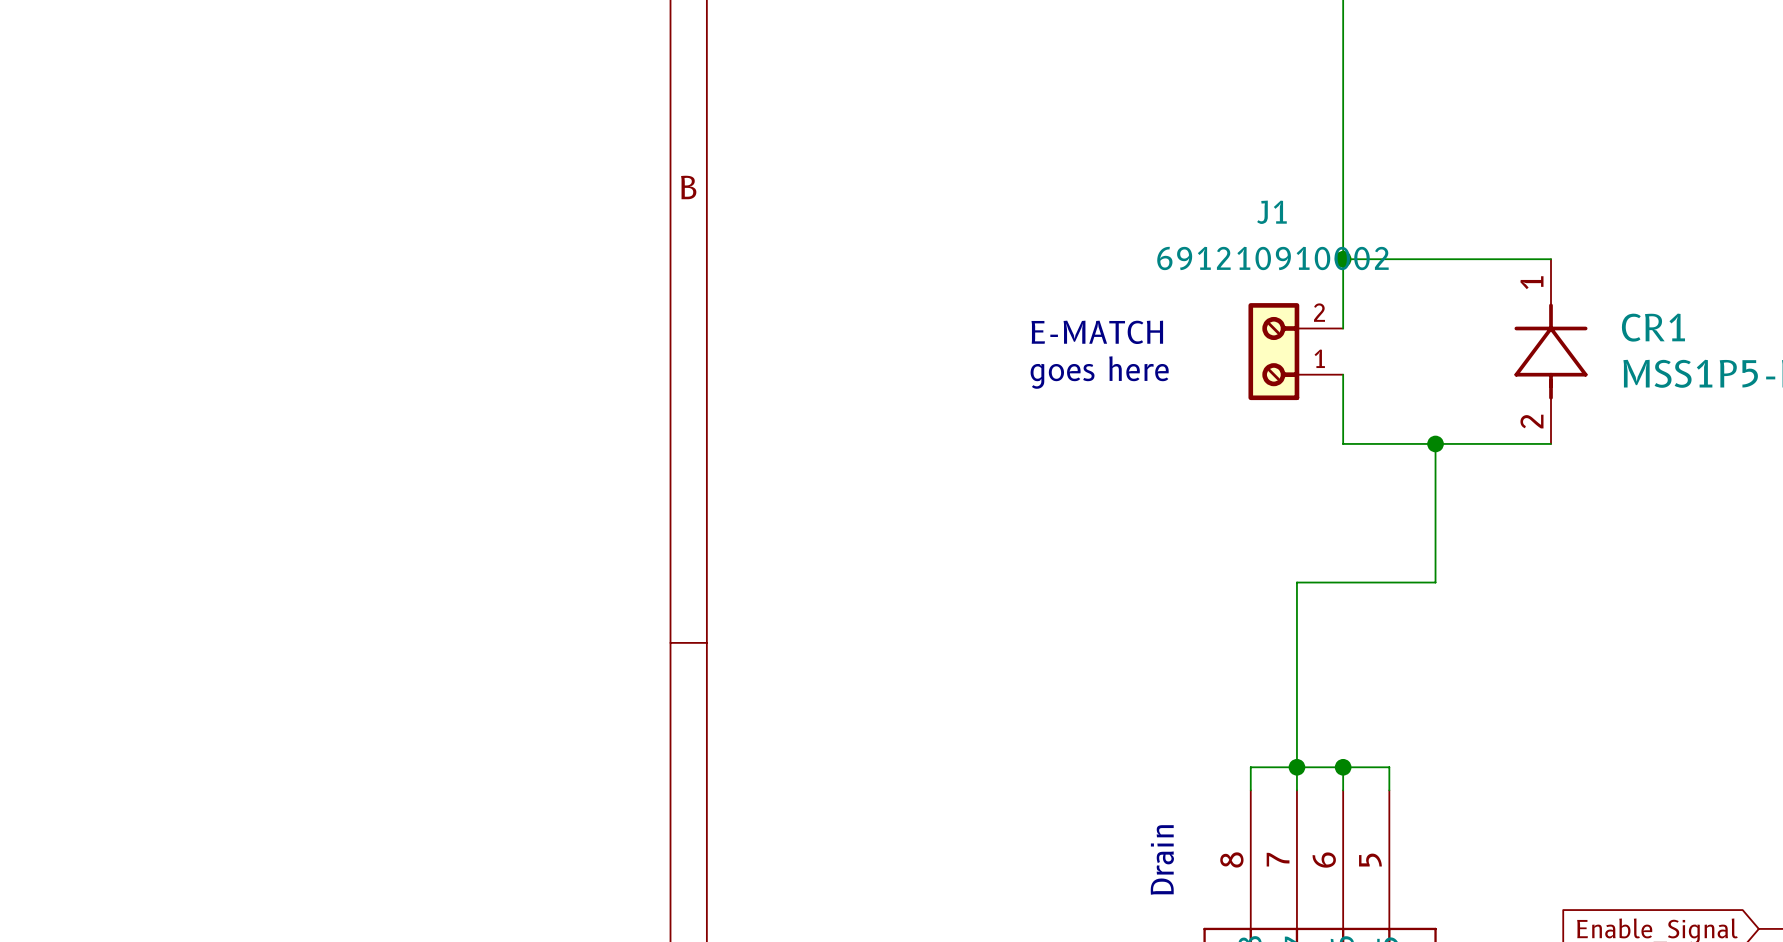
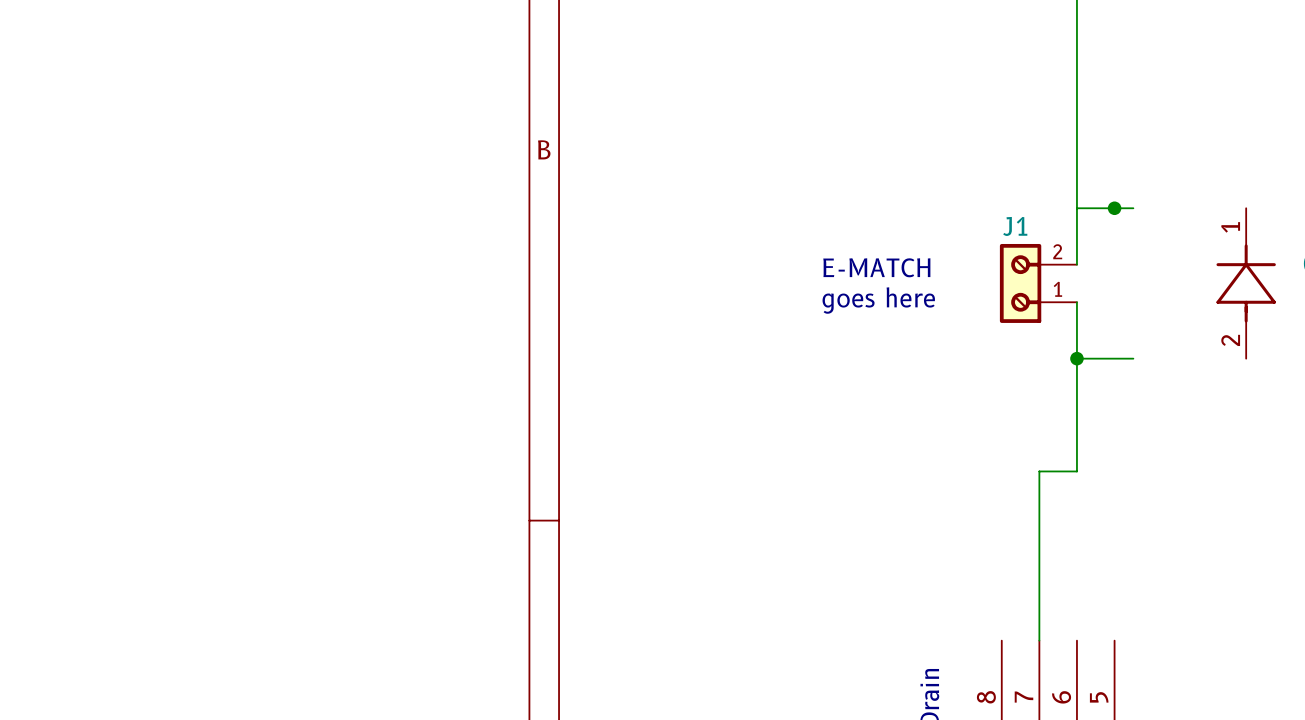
J1 name position: J1 (1271, 212) -> J1 (1015, 226)
J1 value: 691210910002 (1272, 258) -> none
junction position: (1343, 259) -> (1114, 208)
wire: (1412, 259) (1551, 259) -> none
junction: none -> (1076, 358)
wire: (1412, 443) (1551, 443) -> none
wire: (1435, 443) (1435, 582) (1343, 582) -> (1076, 358) (1076, 471)
junction: (1435, 443) -> none
junction: (1296, 767) -> none
wire: (1343, 767) (1343, 790) -> none
junction: (1343, 767) -> none
wire: (1250, 790) (1250, 767) (1389, 767) (1389, 790) -> none

